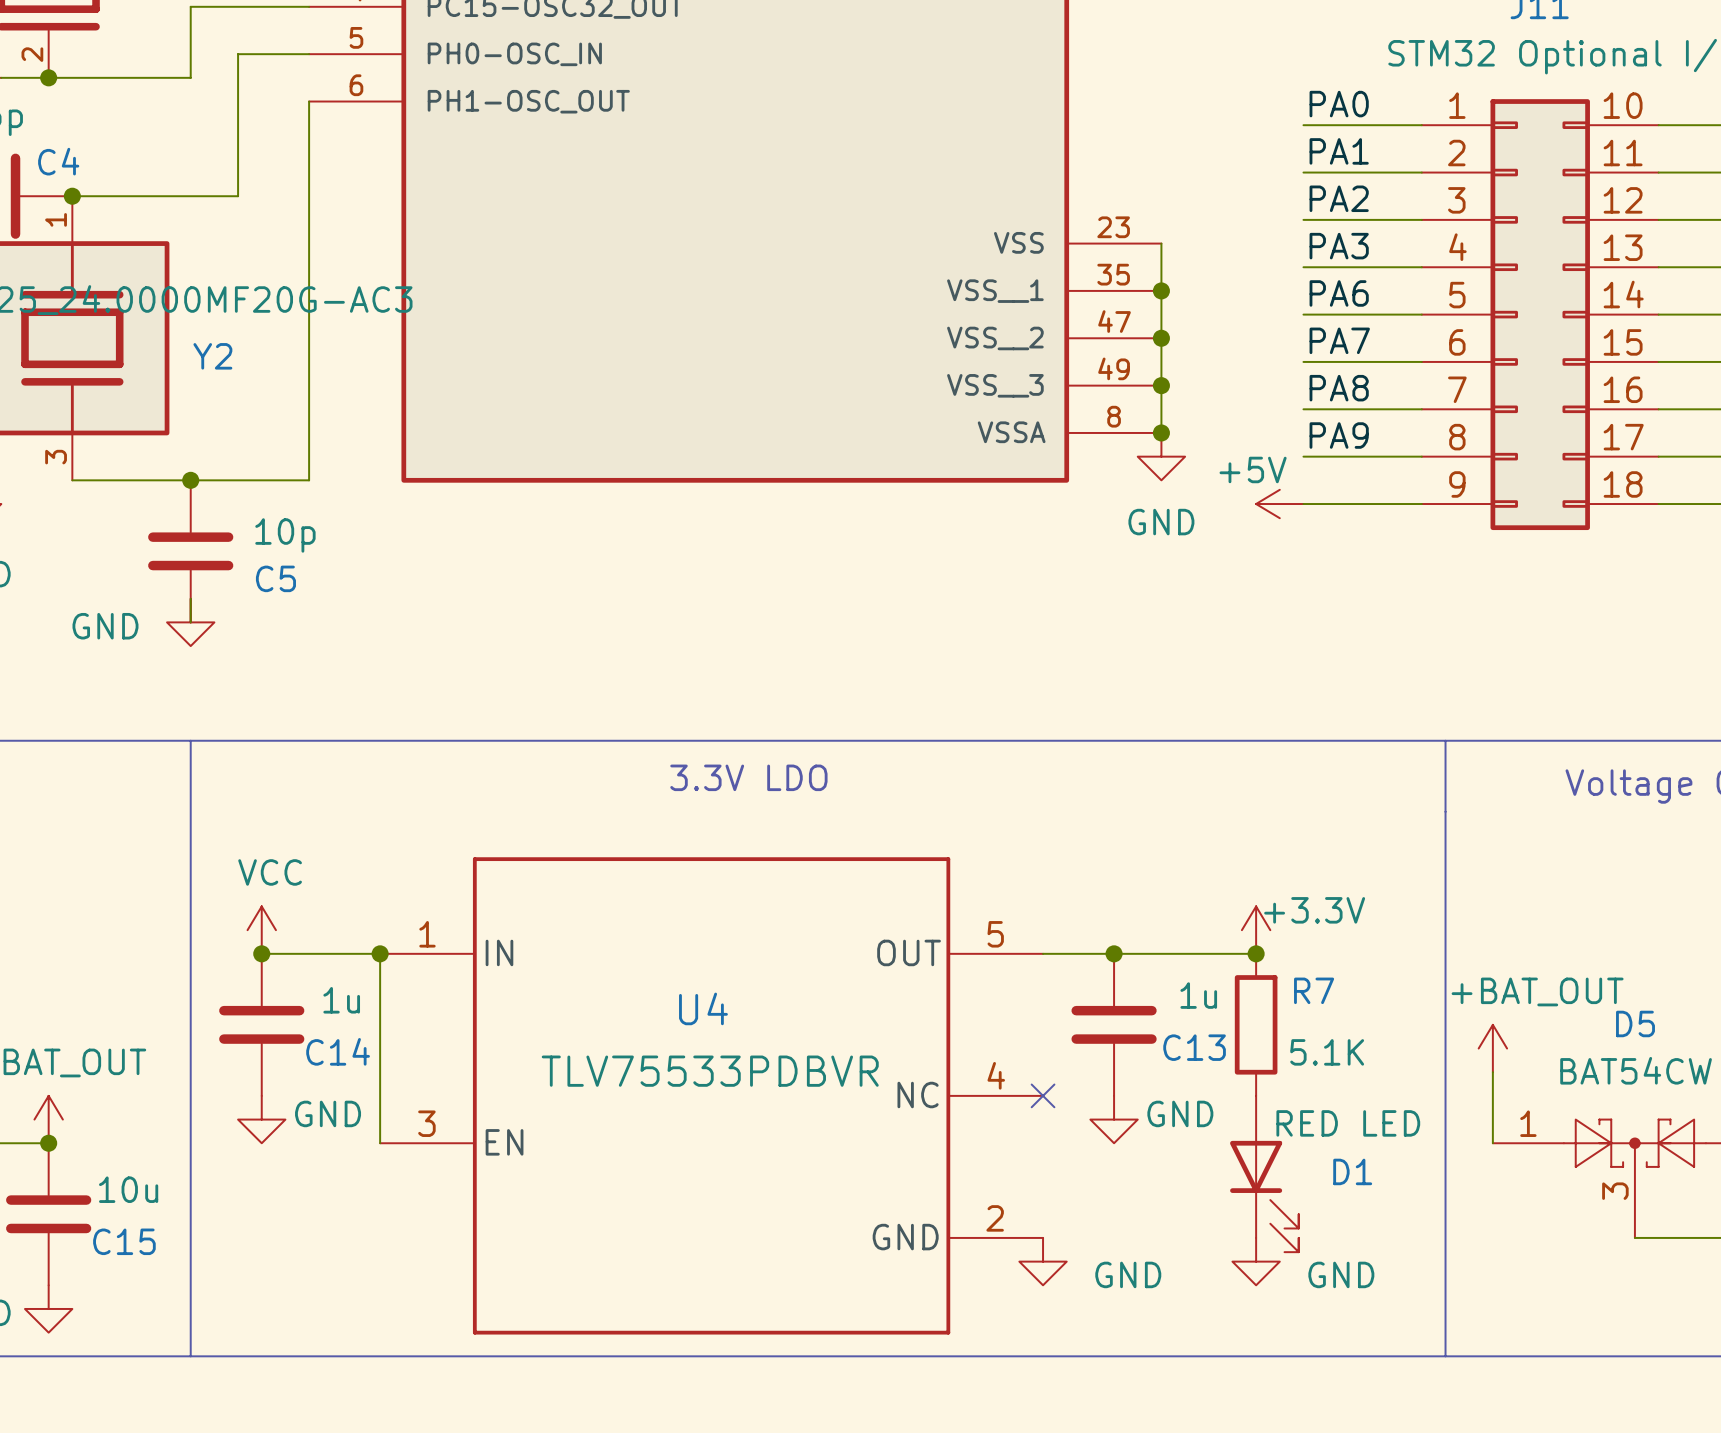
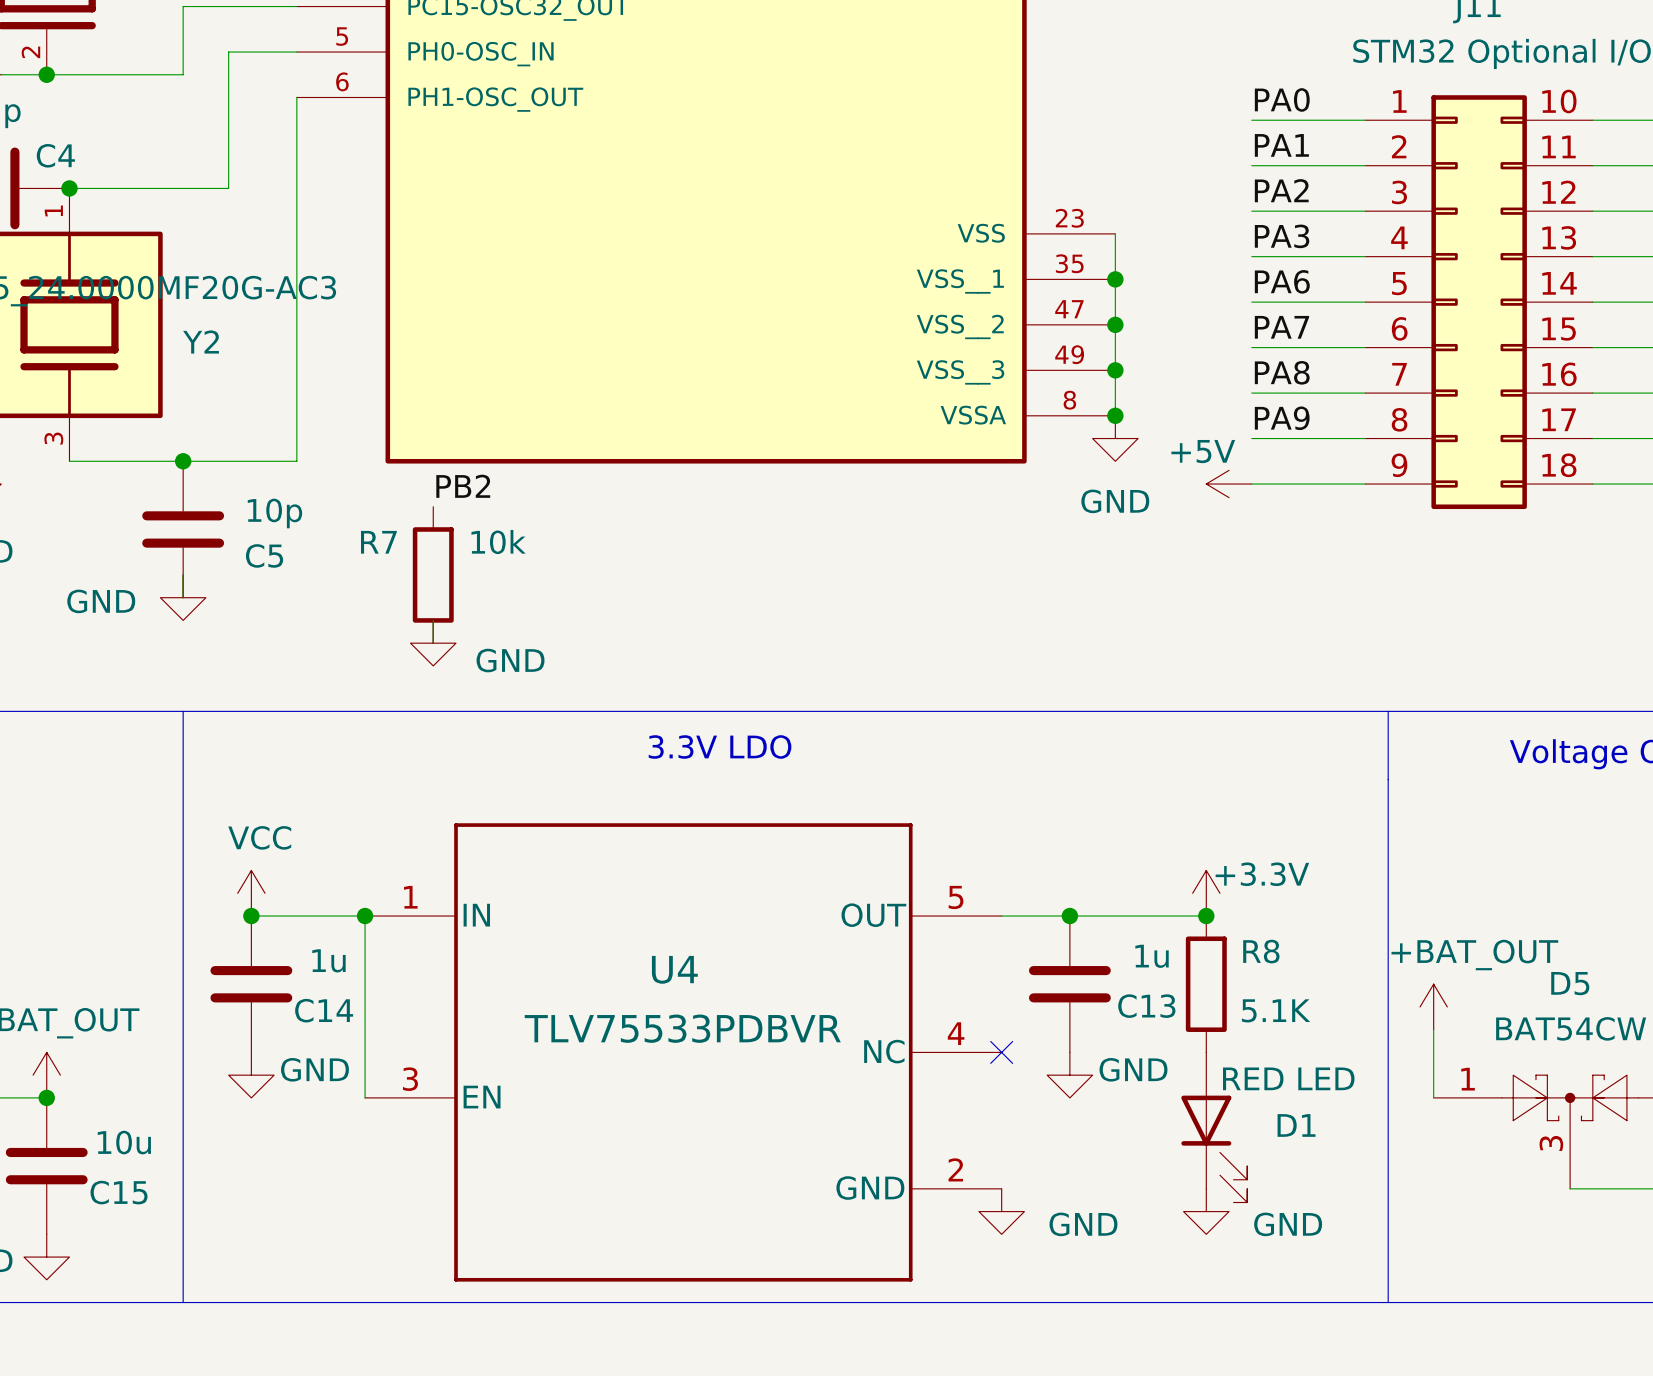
label: none -> PB2 (463, 486)
R7: none -> 10k (433, 574)
wire: none -> (433, 620) (433, 643)
power symbol: none -> GND (433, 643)
R7 name: R7 (1314, 990) -> R8 (1261, 951)

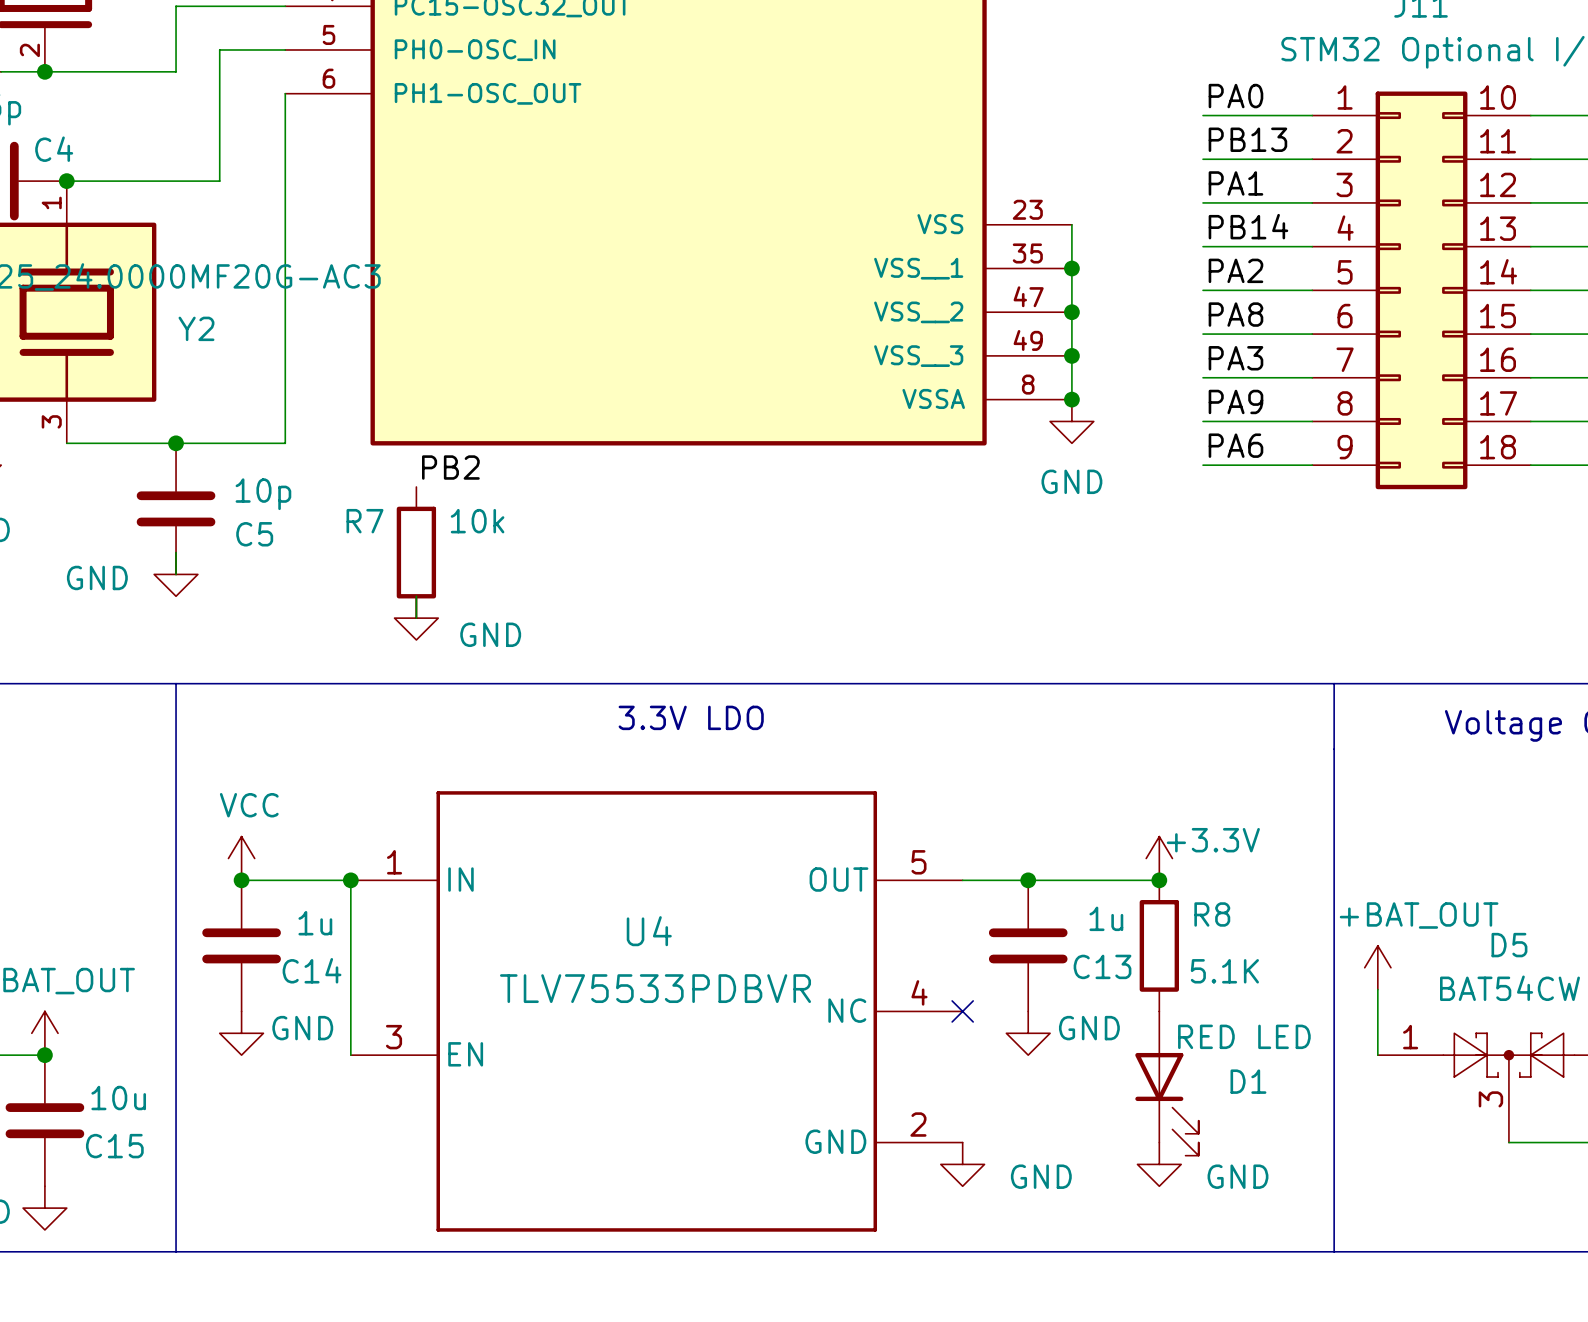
label: PA1 (1281, 145) -> PB13 (1247, 139)
label: PA2 (1281, 190) -> PA1 (1235, 183)
label: PA3 (1282, 236) -> PB14 (1248, 226)
label: PA6 (1282, 281) -> PA2 (1235, 270)
label: PA7 (1281, 327) -> PA8 (1235, 314)
label: PA8 (1282, 372) -> PA3 (1235, 358)
label: none -> PA6 (1235, 445)
power symbol: +5V (1229, 484) -> none

